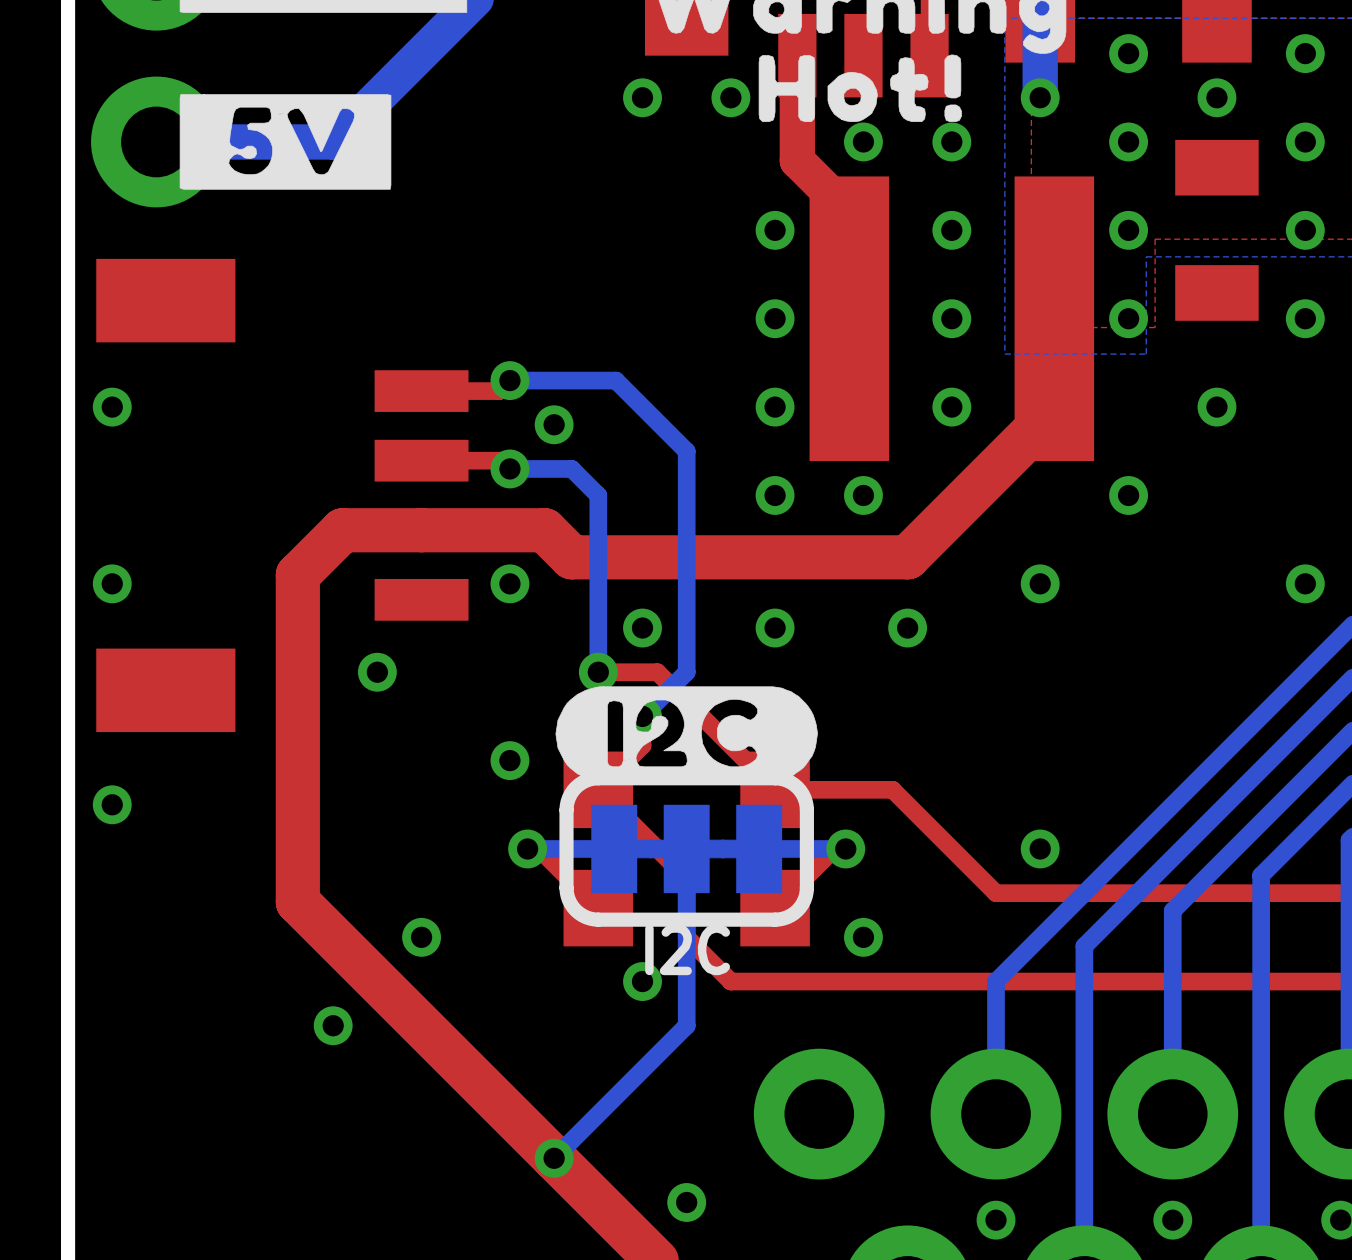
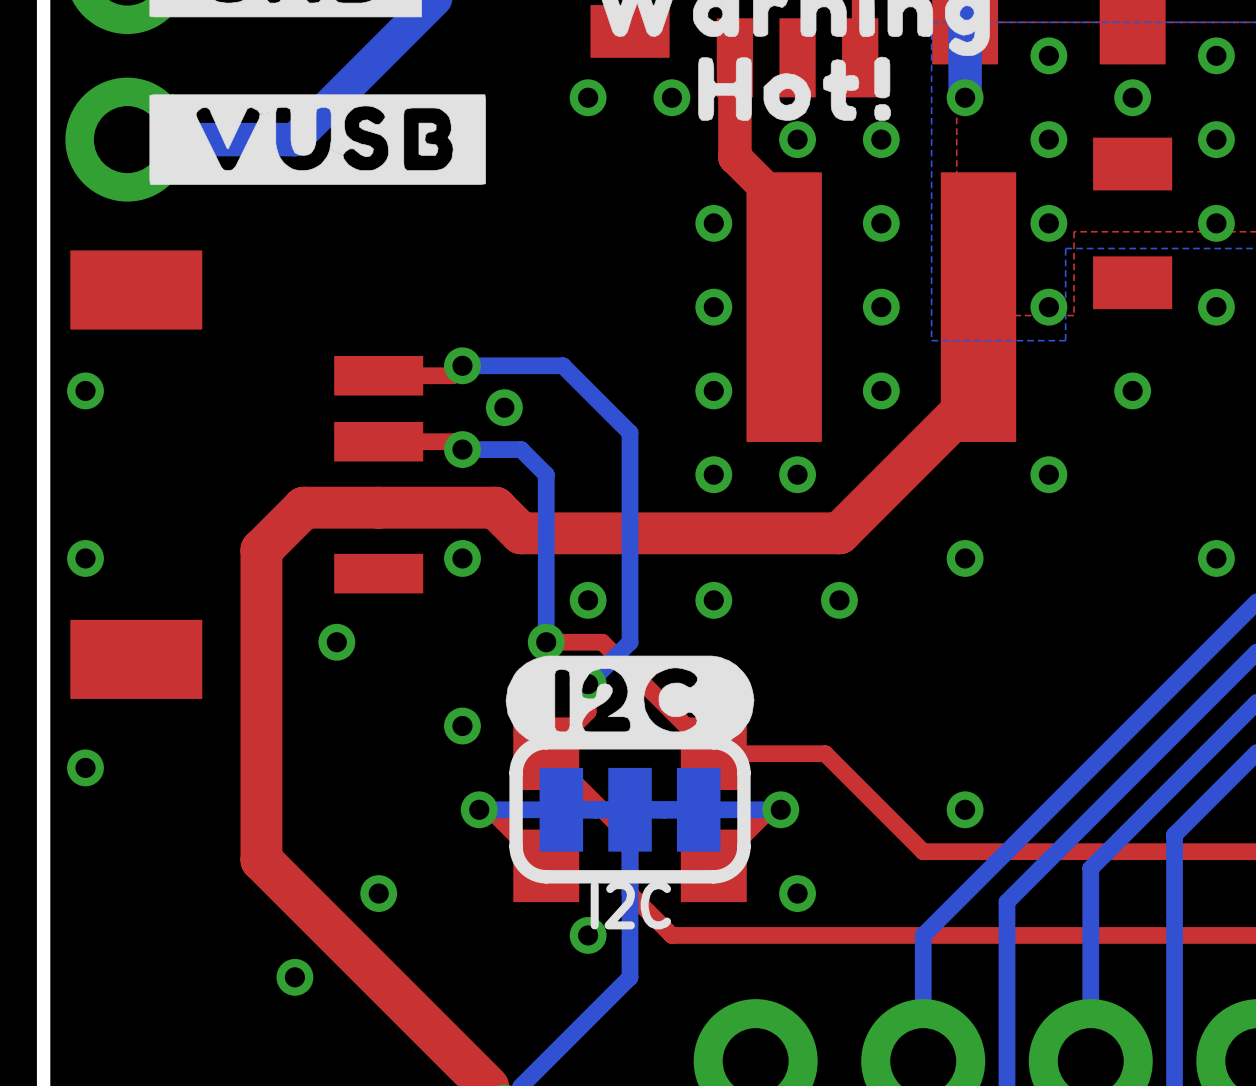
drawing: [179, 94, 392, 190] -> none
drawing: none -> [149, 94, 486, 185]

